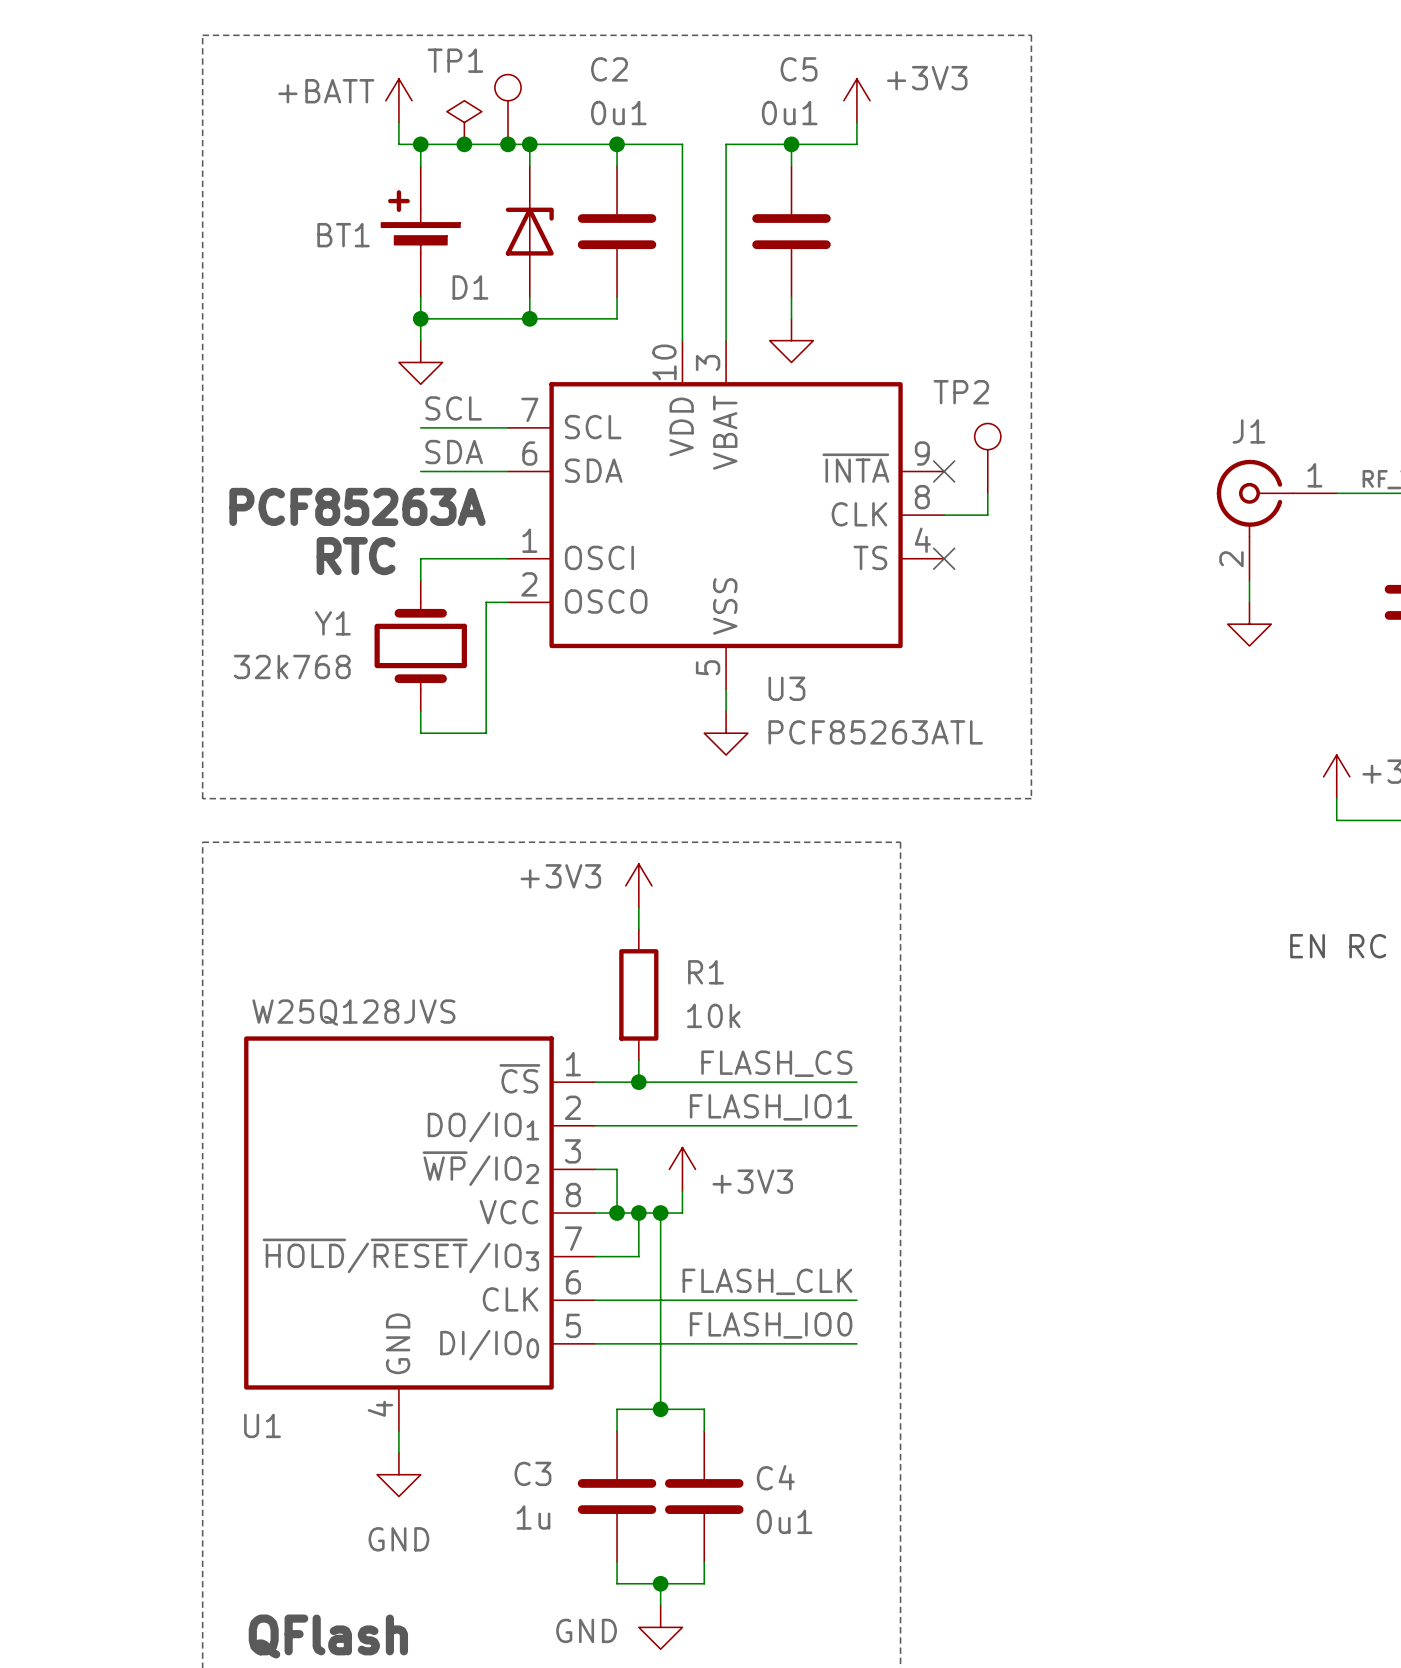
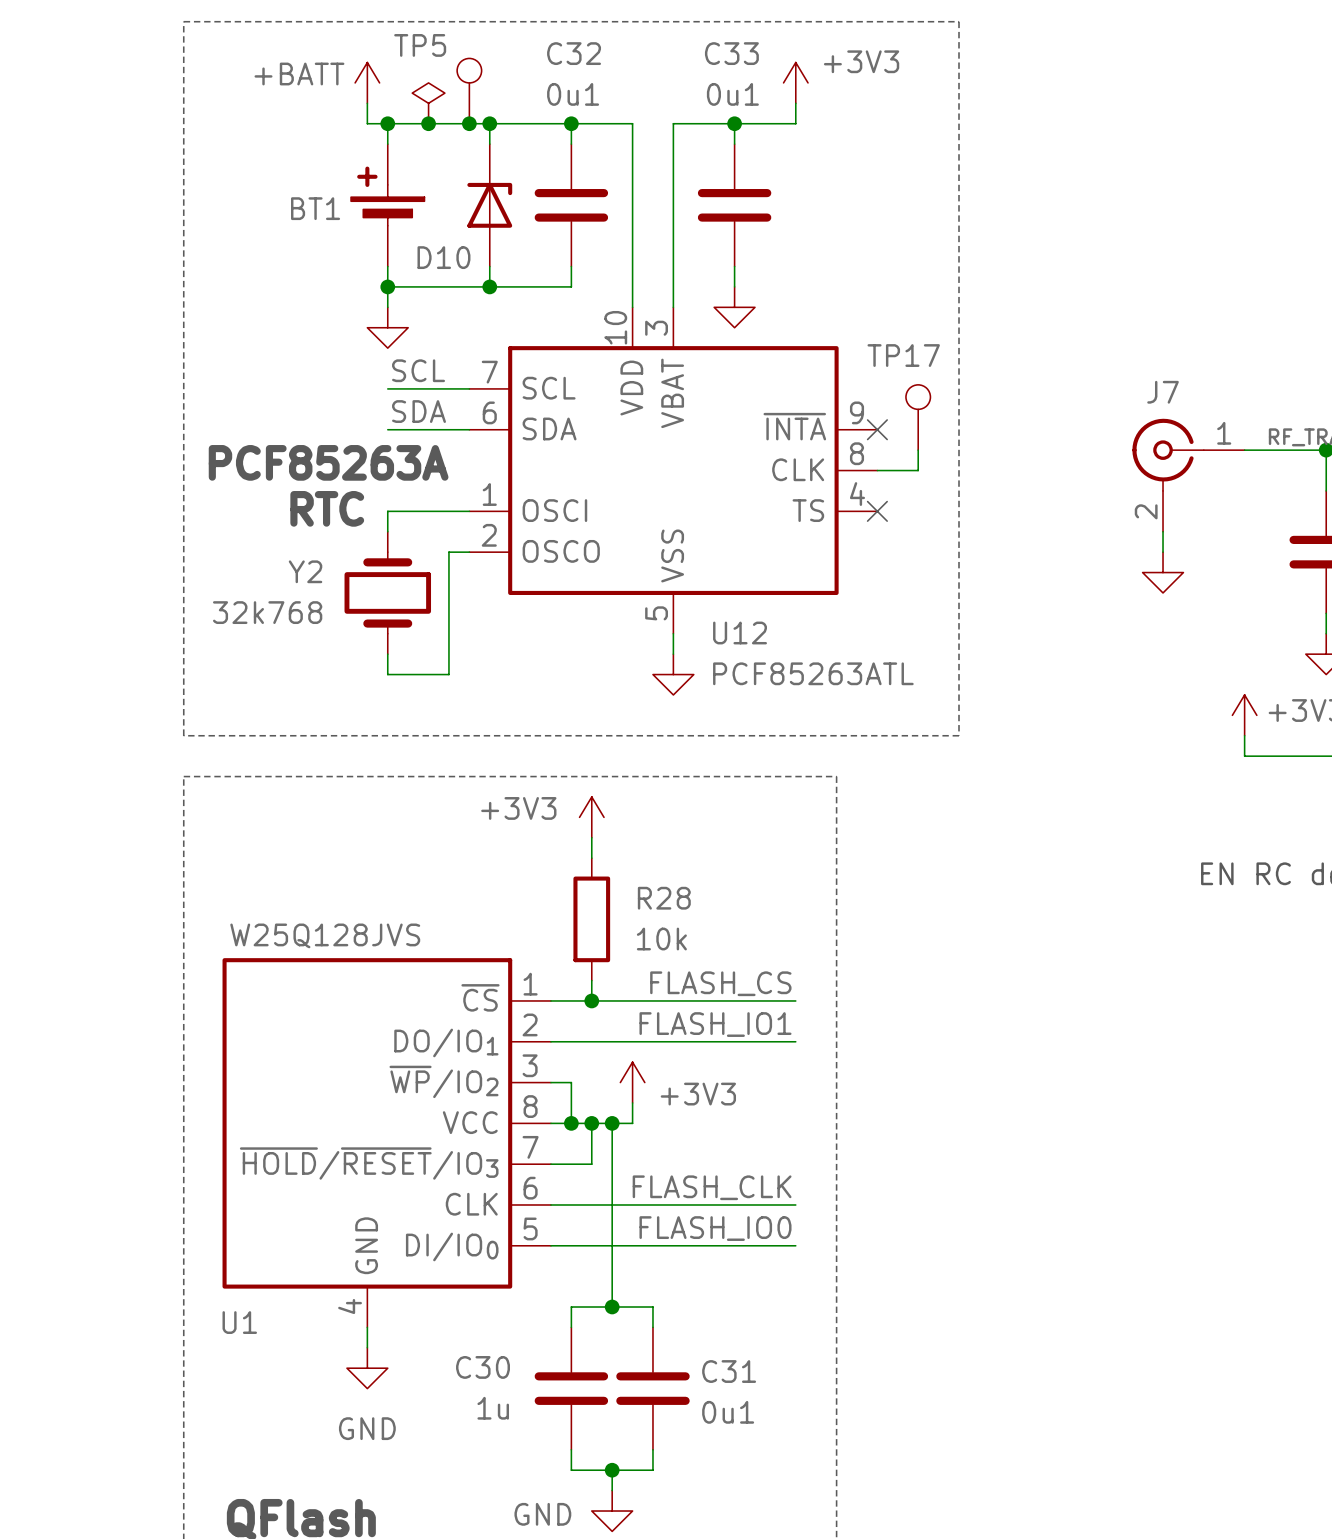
TP1 name: TP1 (455, 60) -> TP5 (420, 45)
C2 name: C2 (609, 69) -> C32 (574, 53)
C5 name: C5 (799, 69) -> C33 (731, 53)
D1 name: D1 (470, 287) -> D10 (443, 257)
TP2 name: TP2 (961, 392) -> TP17 (903, 355)
J1 name: J1 (1248, 431) -> J7 (1163, 392)
Y1 name: Y1 (332, 623) -> Y2 (305, 571)
U3 name: U3 (786, 688) -> U12 (740, 632)
R1 name: R1 (705, 972) -> R28 (664, 898)
C3 name: C3 (532, 1473) -> C30 (483, 1367)
C4 name: C4 (775, 1477) -> C31 (729, 1371)

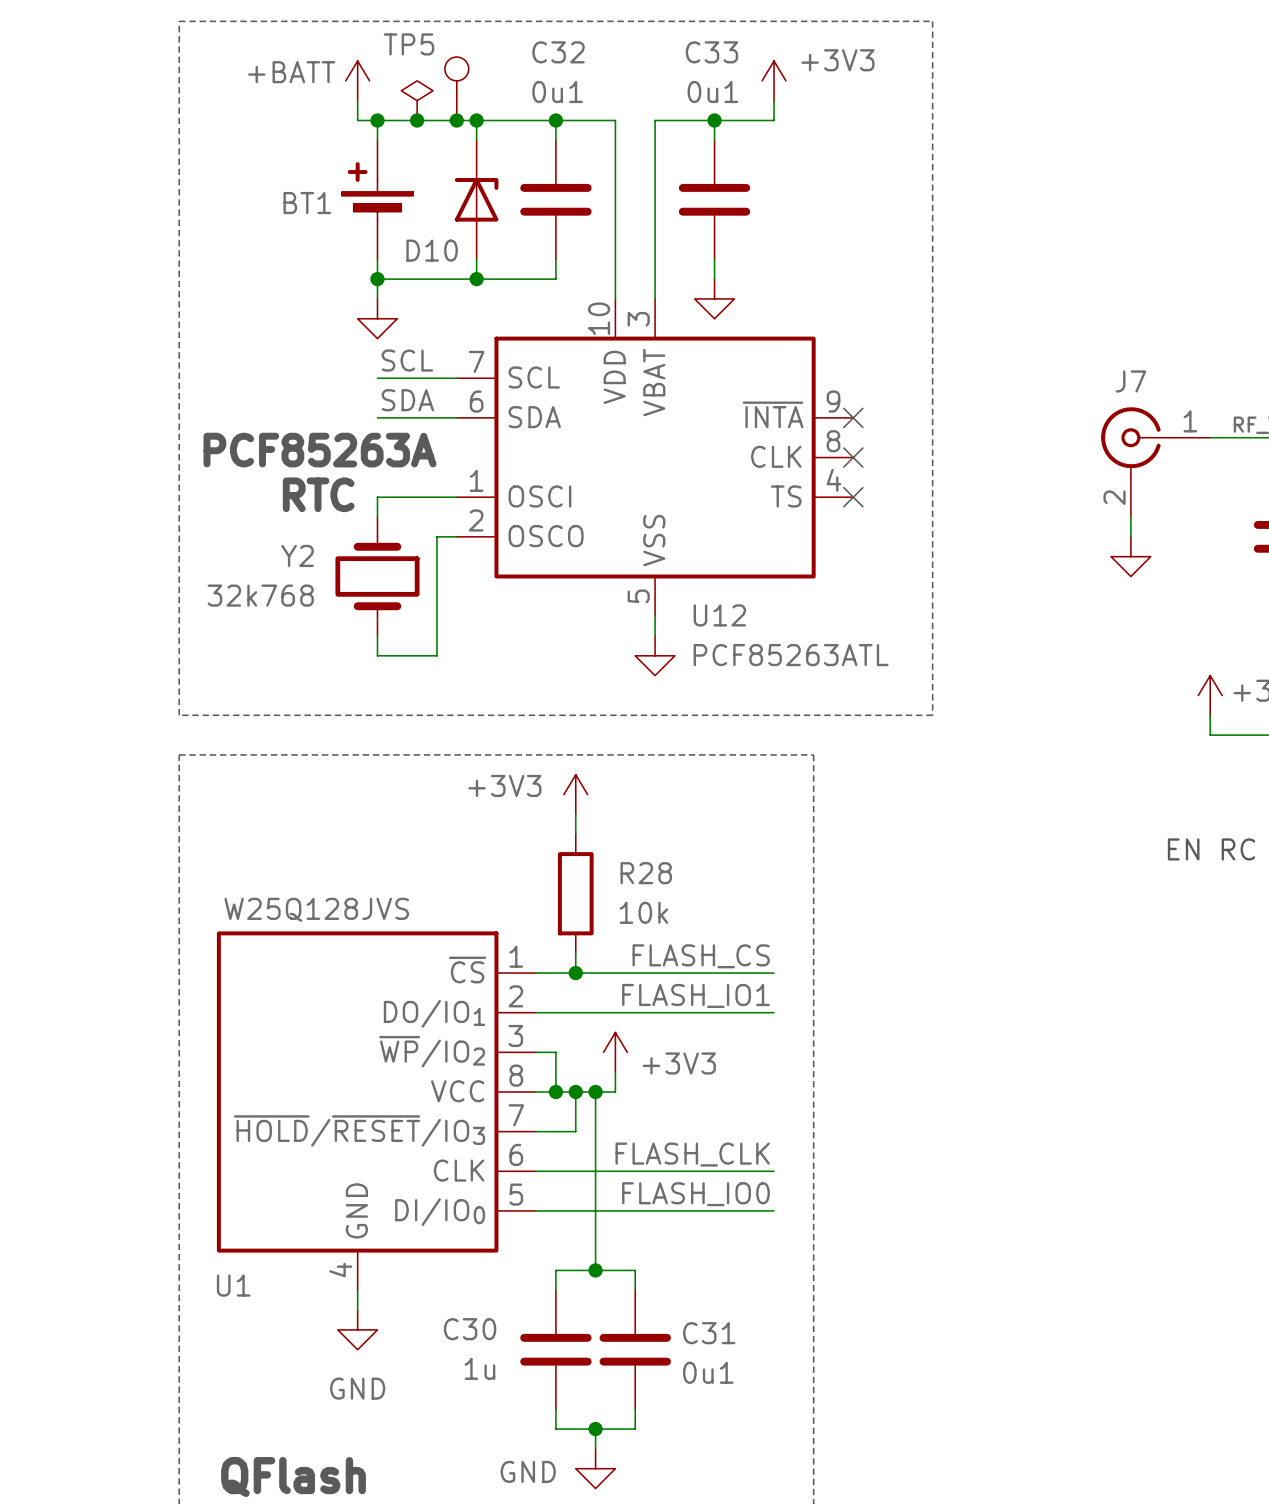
TP17: (918, 417) -> none
wire: (918, 450) (918, 470) (877, 470) -> none
no-connect mark: none -> (853, 457)

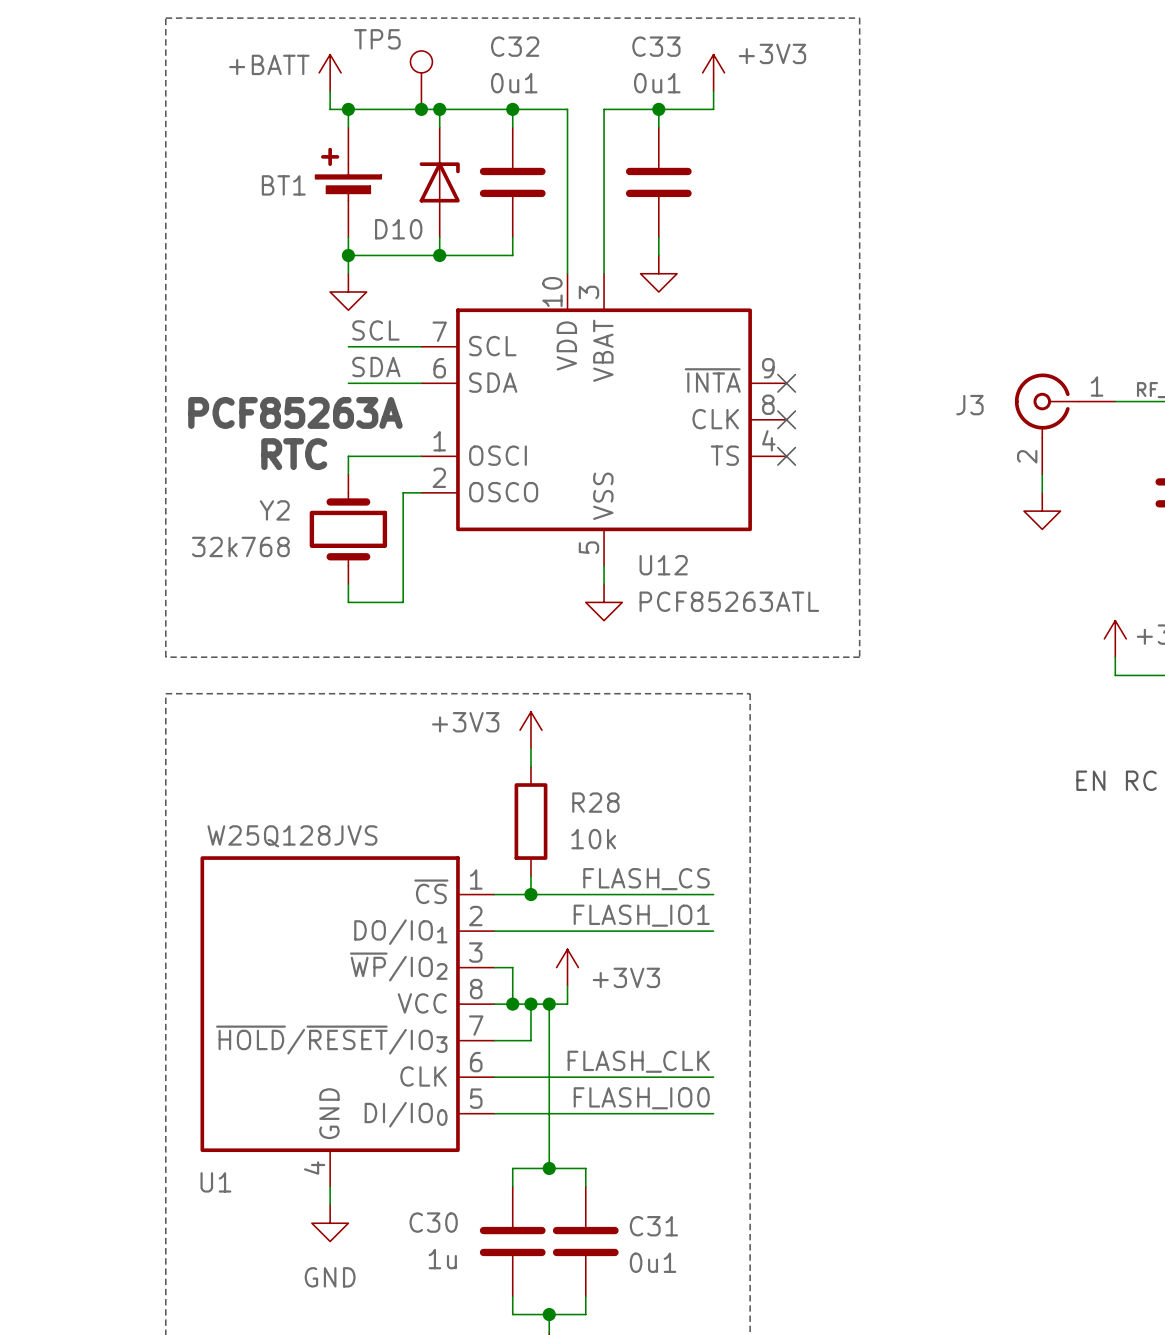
power symbol: (417, 100) -> none
junction: (417, 120) -> none
J7 name: J7 (1130, 381) -> J3 (969, 405)

